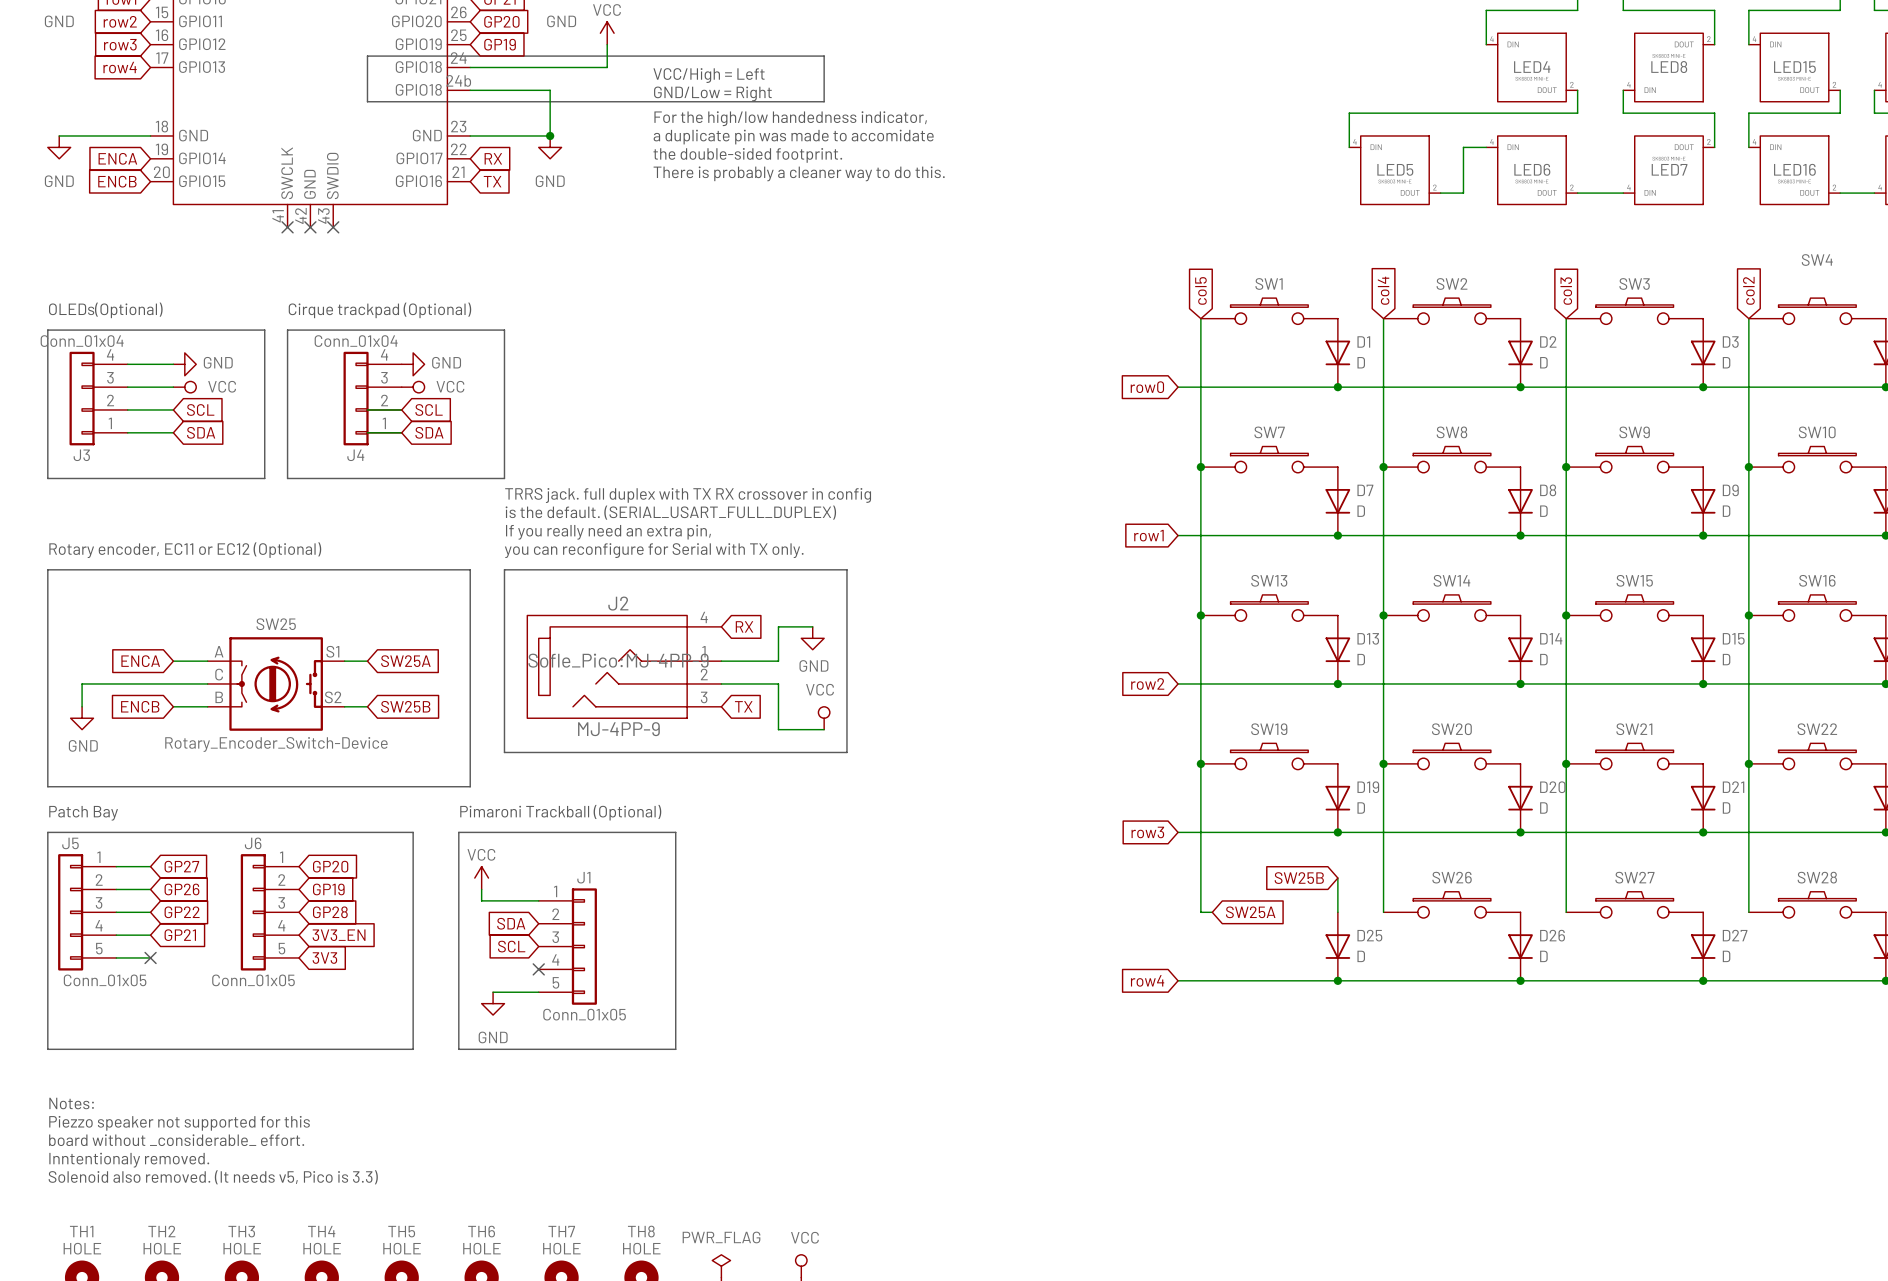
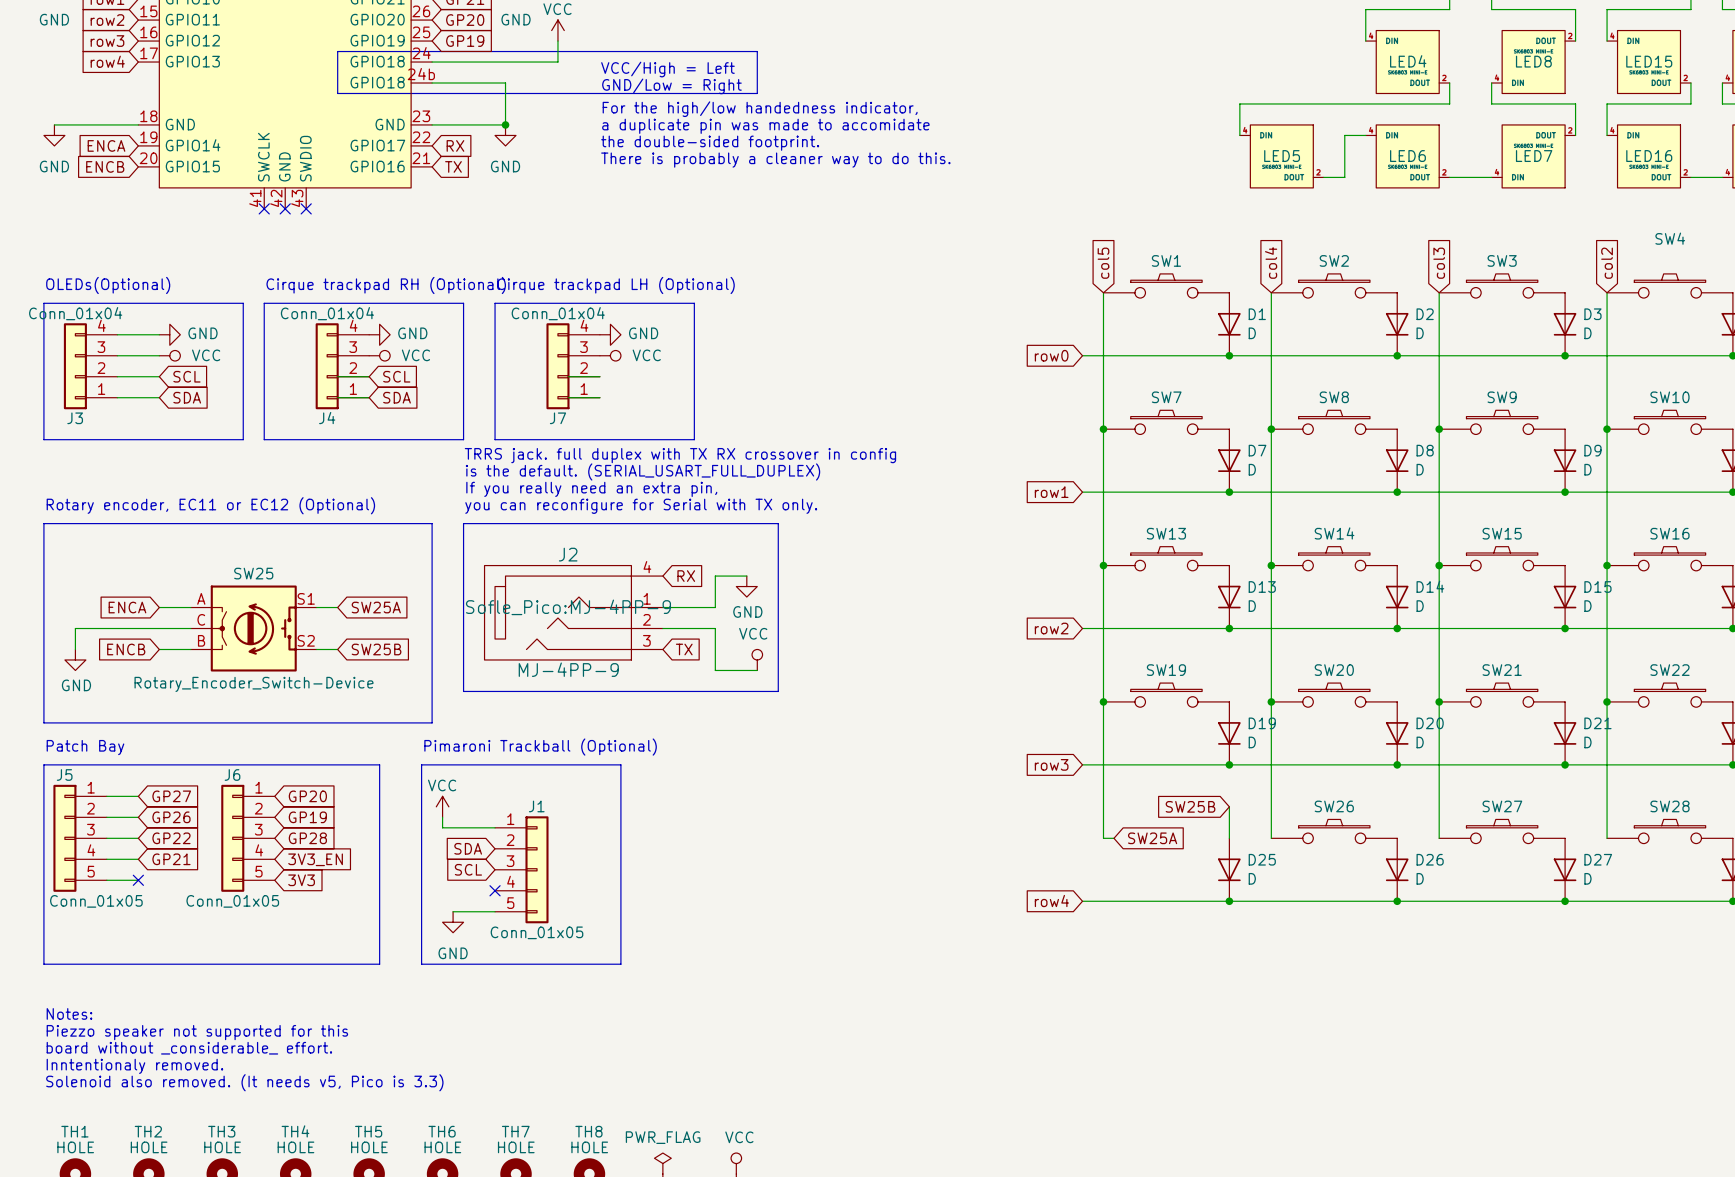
text: Cirque trackpad (Optional) (379, 310) -> Cirque trackpad RH (Optional) (386, 285)
text: none -> Cirque trackpad LH (Optional) (616, 285)
line: none -> (495, 303) (694, 303) (694, 439) (495, 439) (495, 303)
power symbol: none -> GND (610, 334)
power symbol: none -> VCC (610, 355)
J7: none -> Conn_01x04 (573, 366)
wire: none -> (568, 376) (599, 376)
wire: none -> (568, 397) (599, 397)

